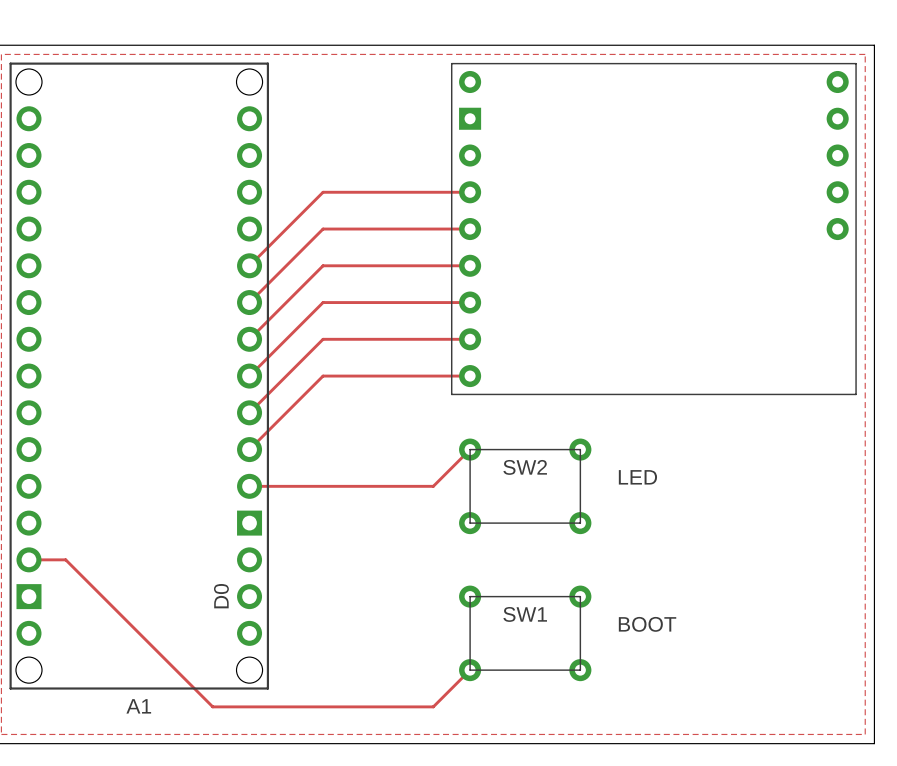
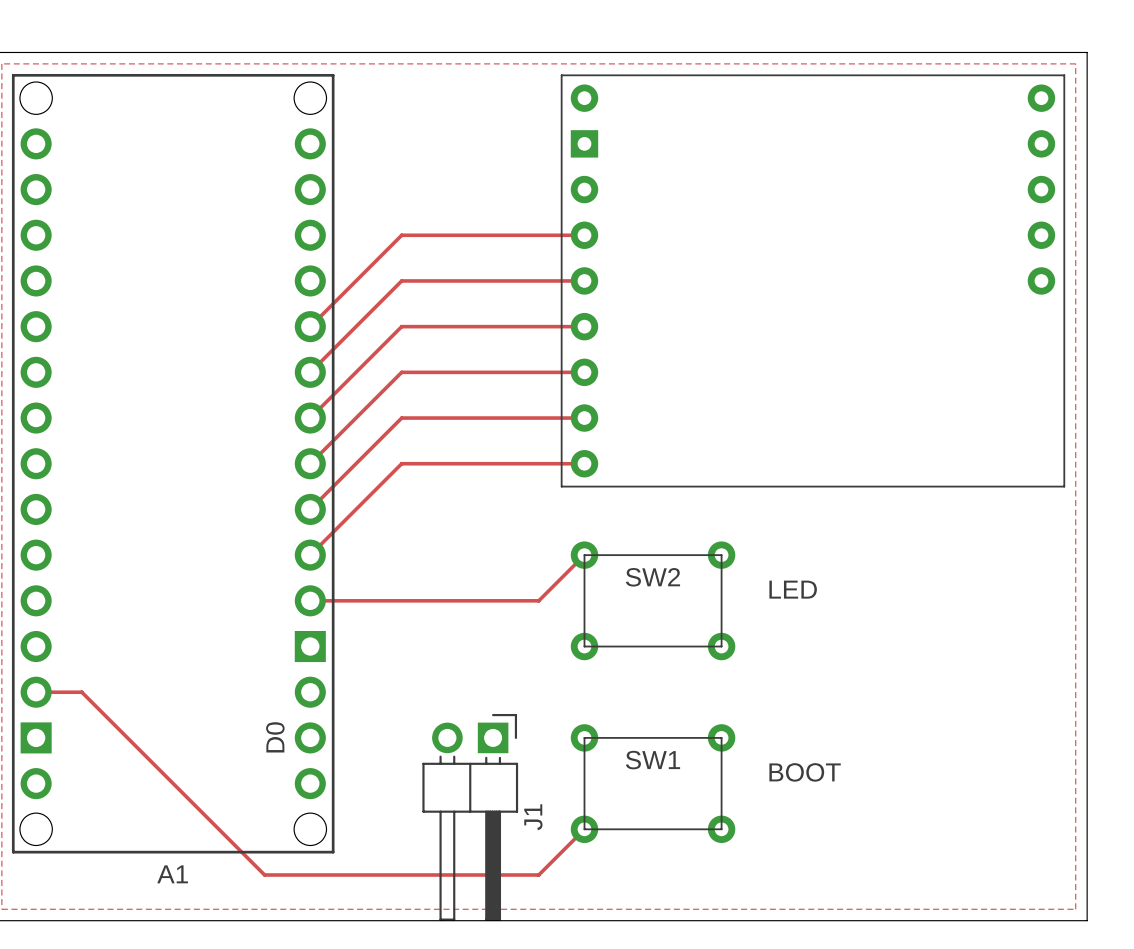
J1: none -> (470, 817)

